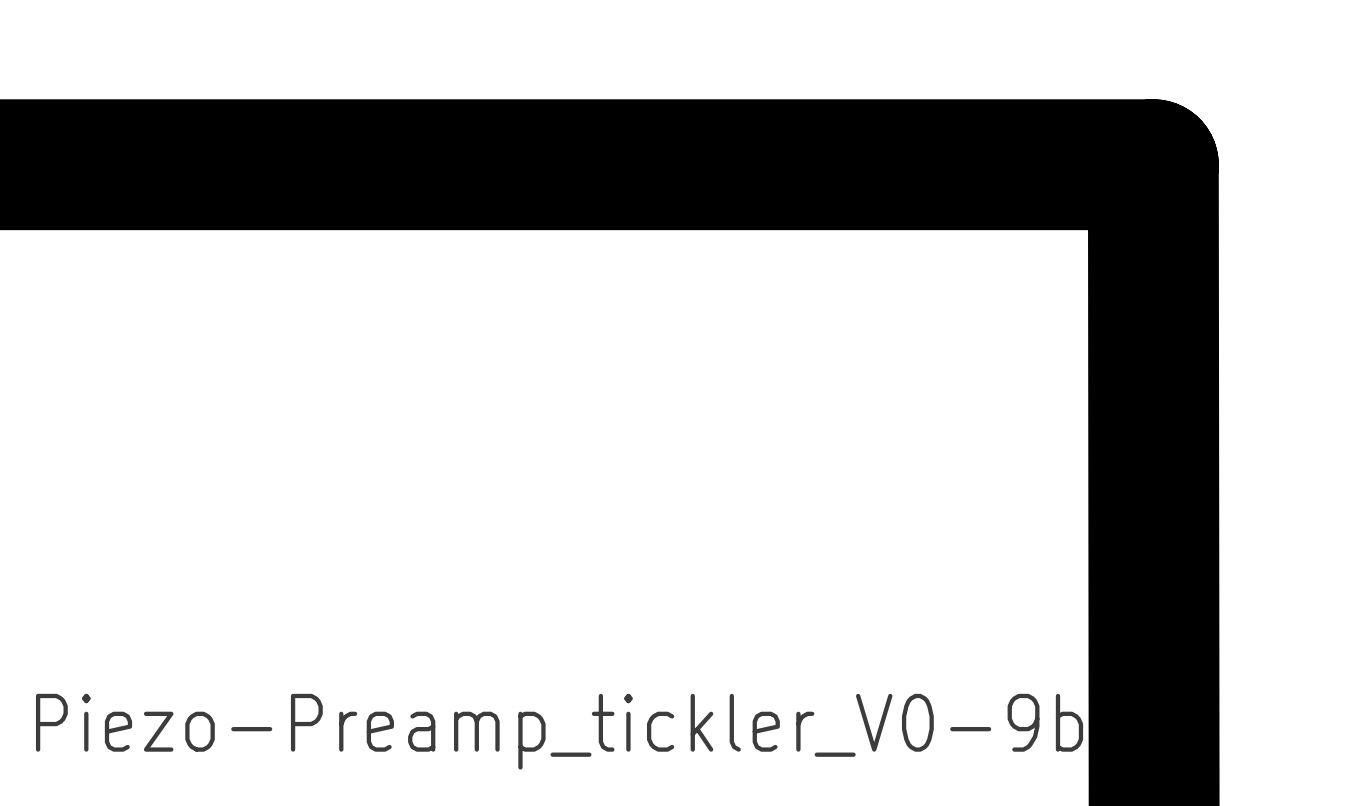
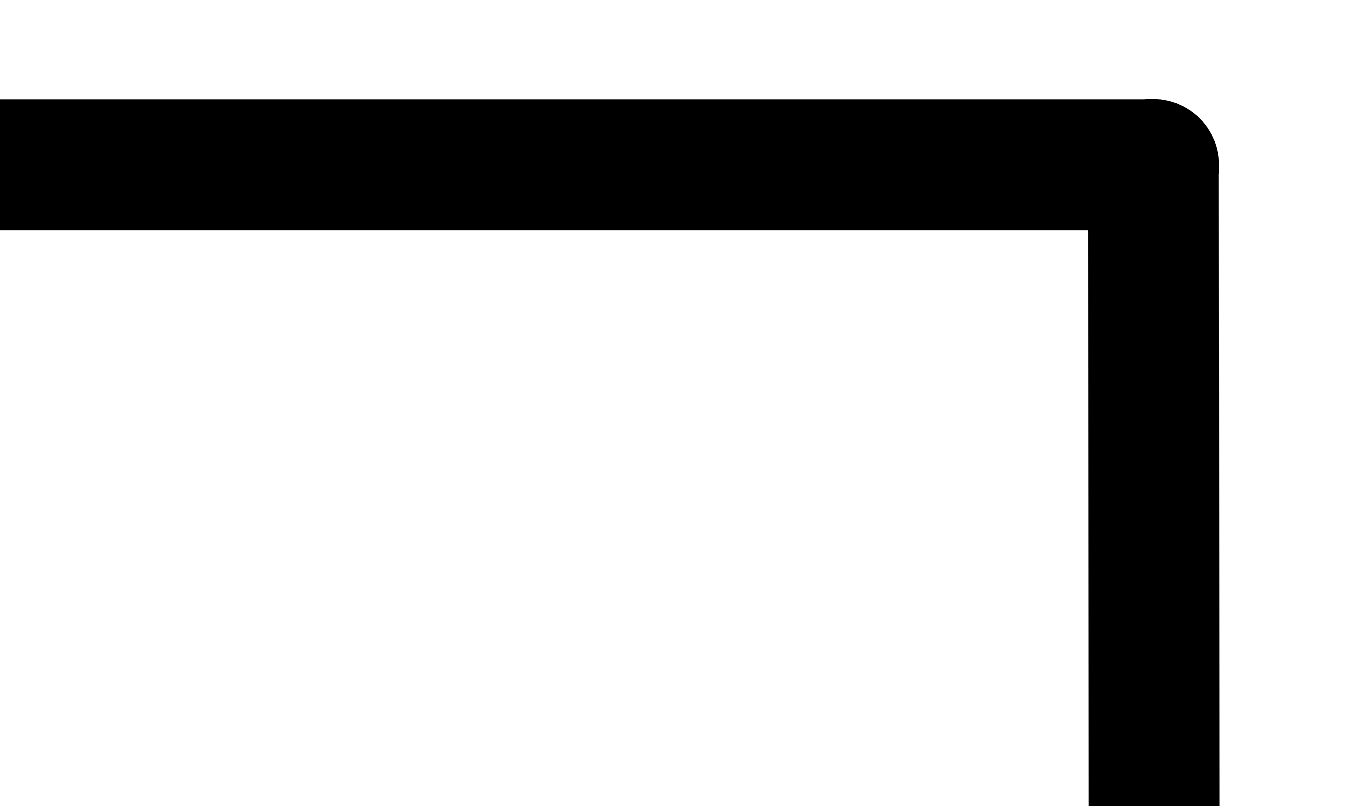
text: Piezo-Preamp_tickler_V0-9b (559, 731) -> none

